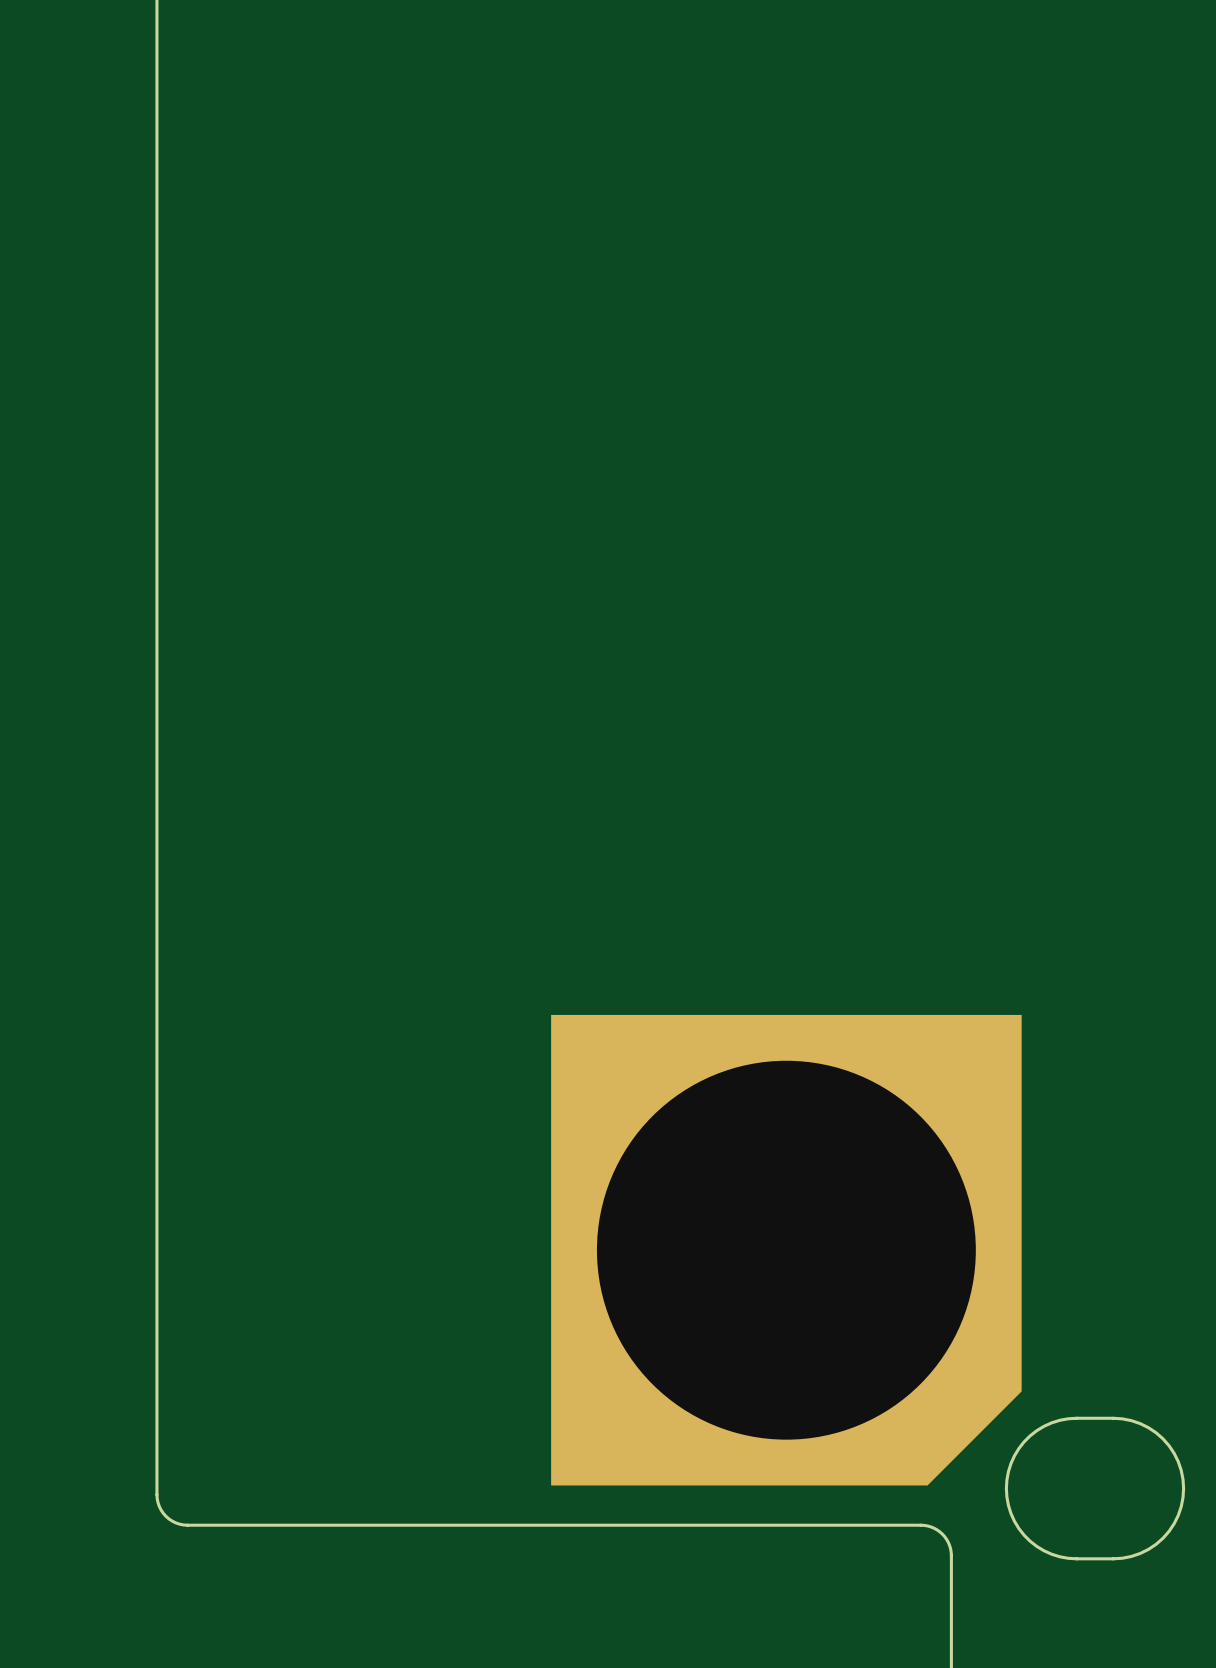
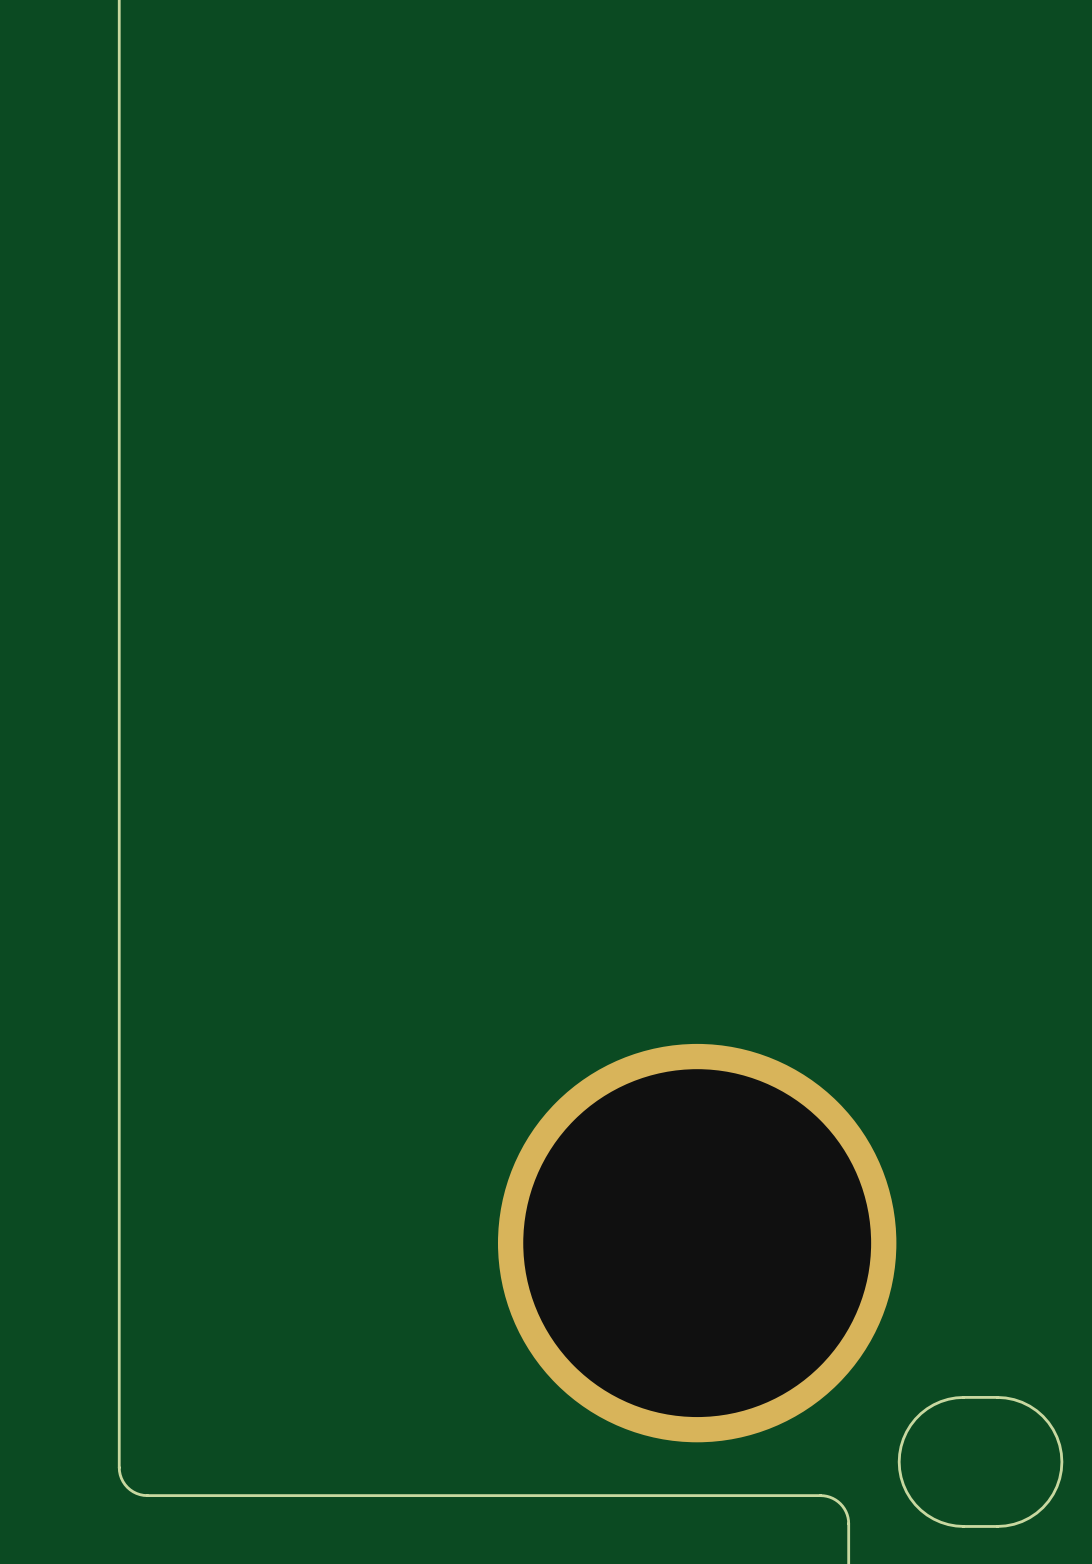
part footprint: [551, 1014, 1022, 1486] -> [497, 1043, 897, 1443]

